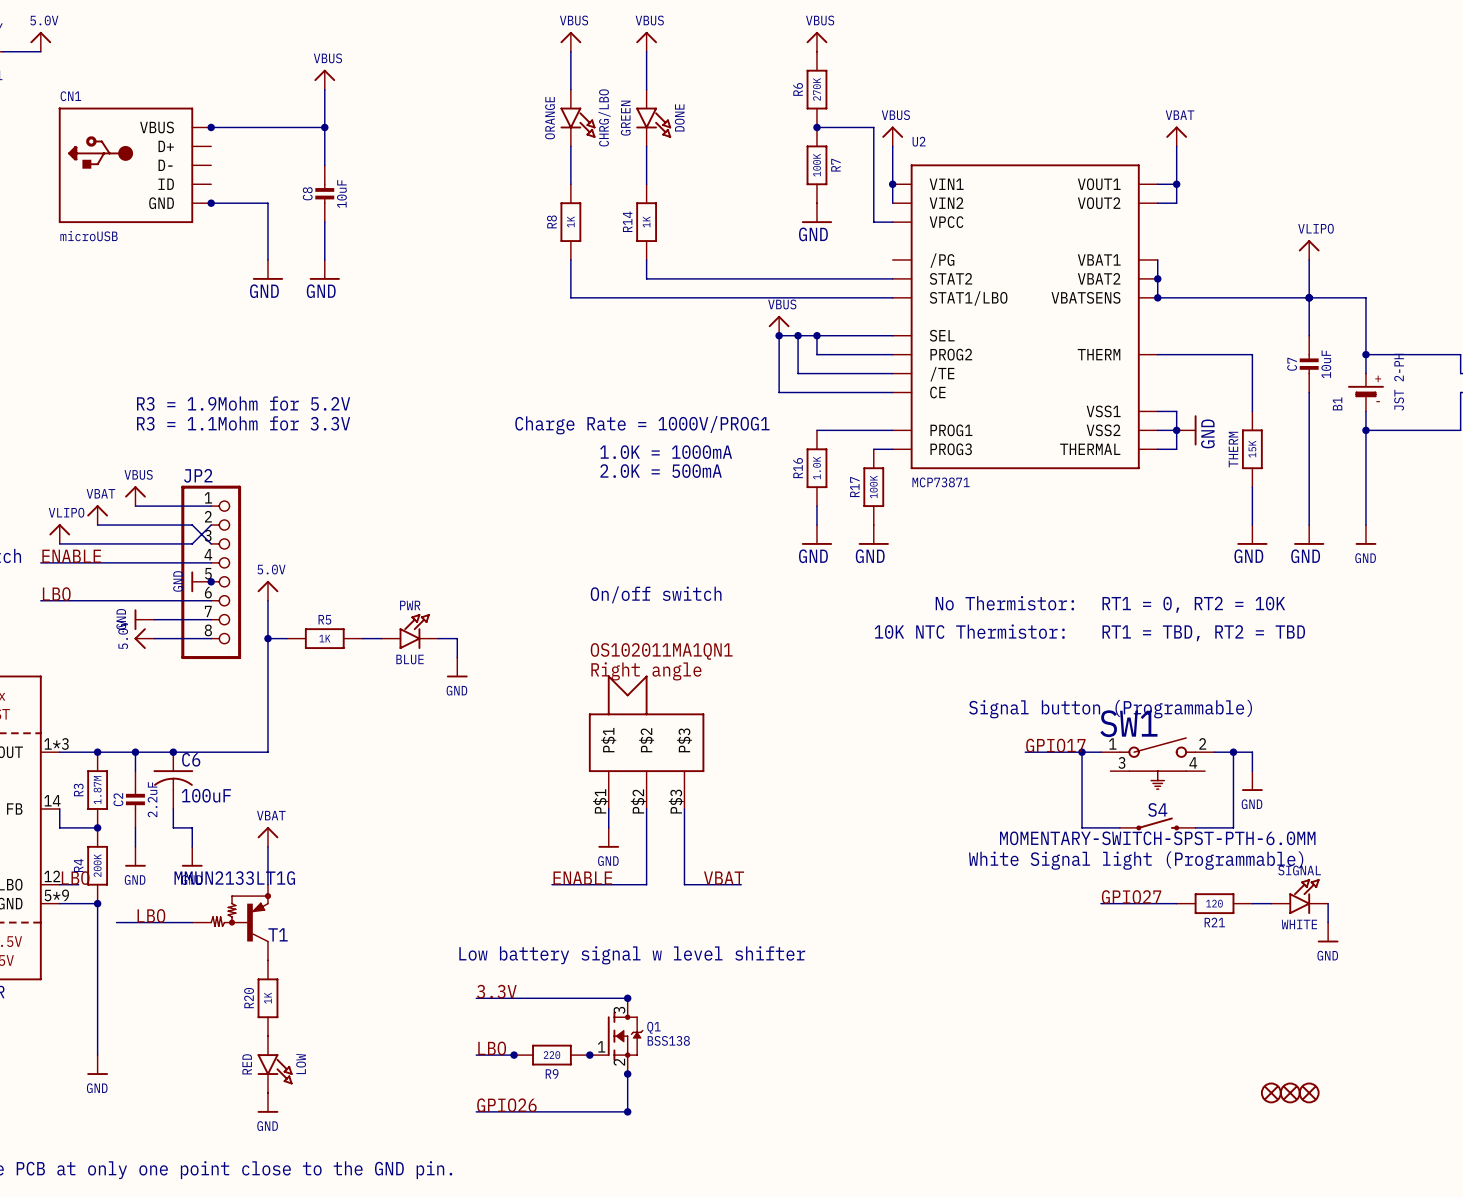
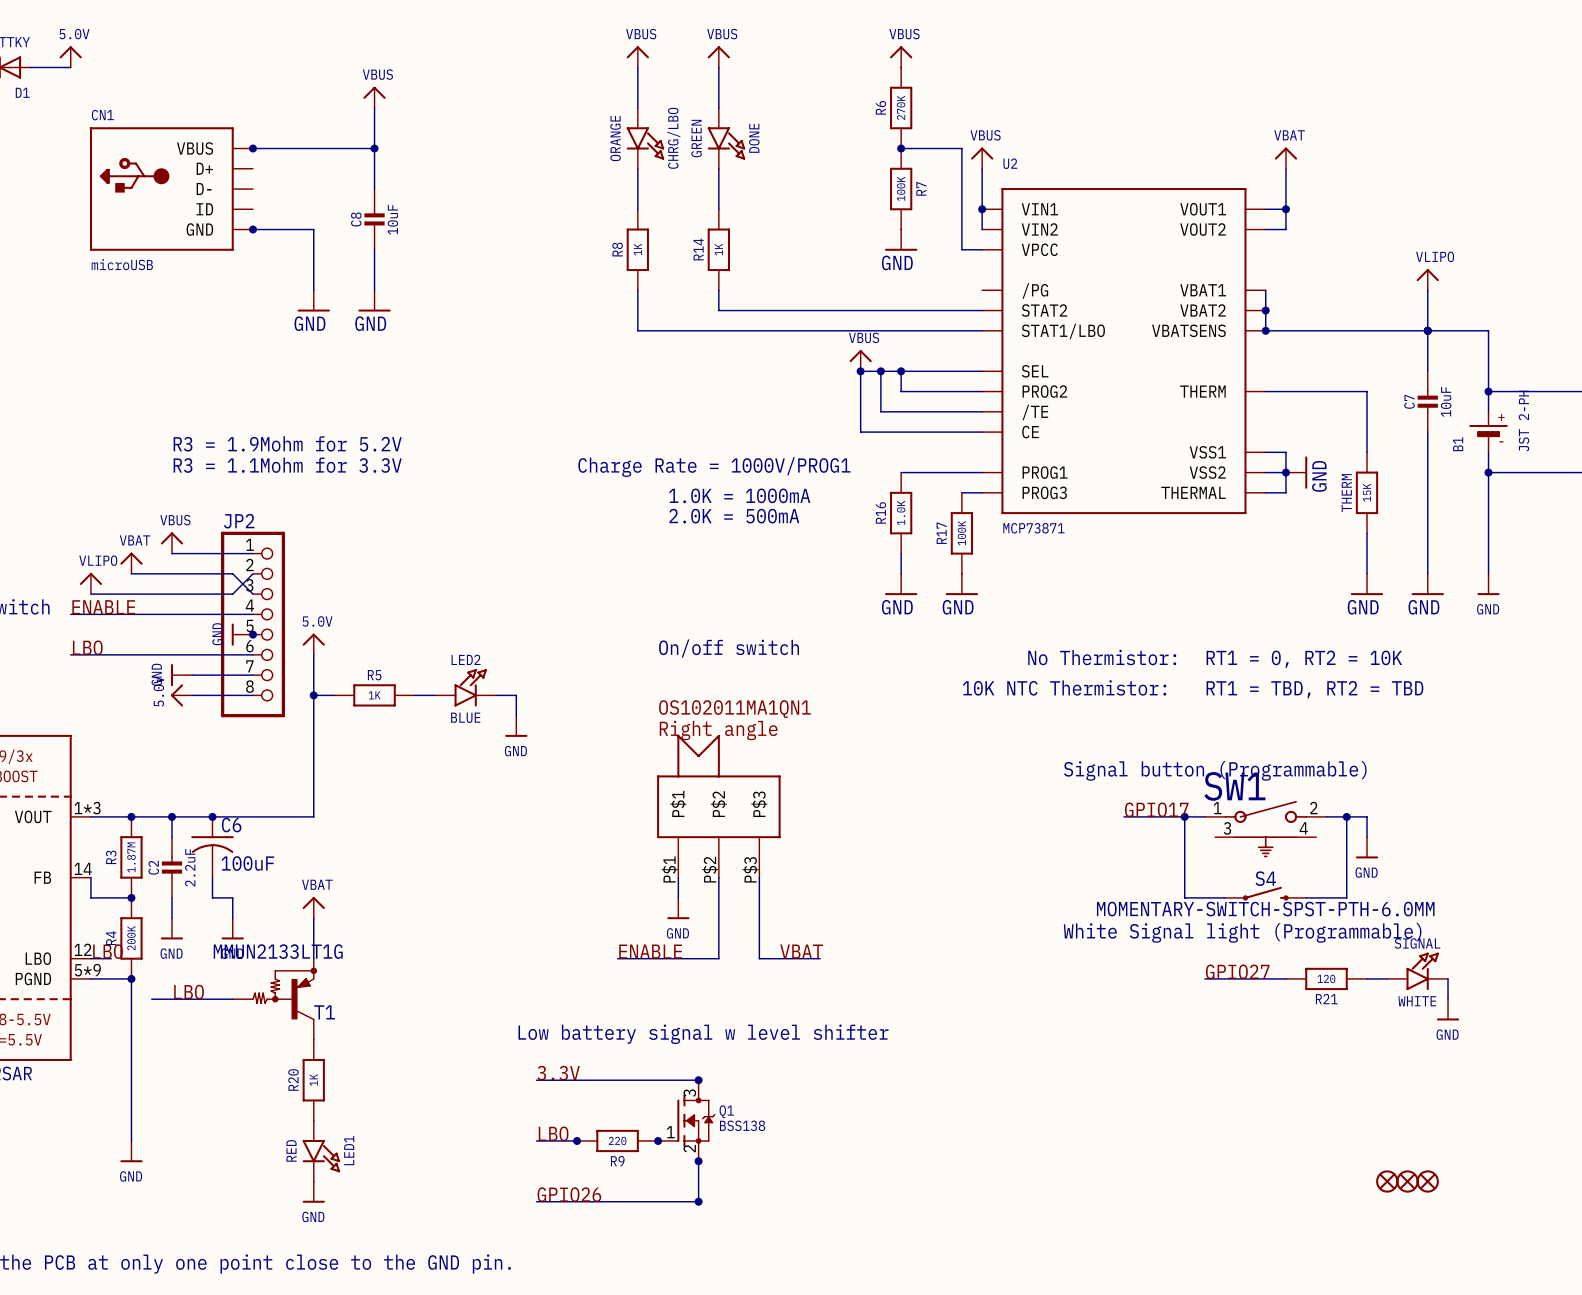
PWR name: PWR (410, 605) -> LED2 (466, 659)
LOW name: LOW (301, 1064) -> LED1 (349, 1150)

